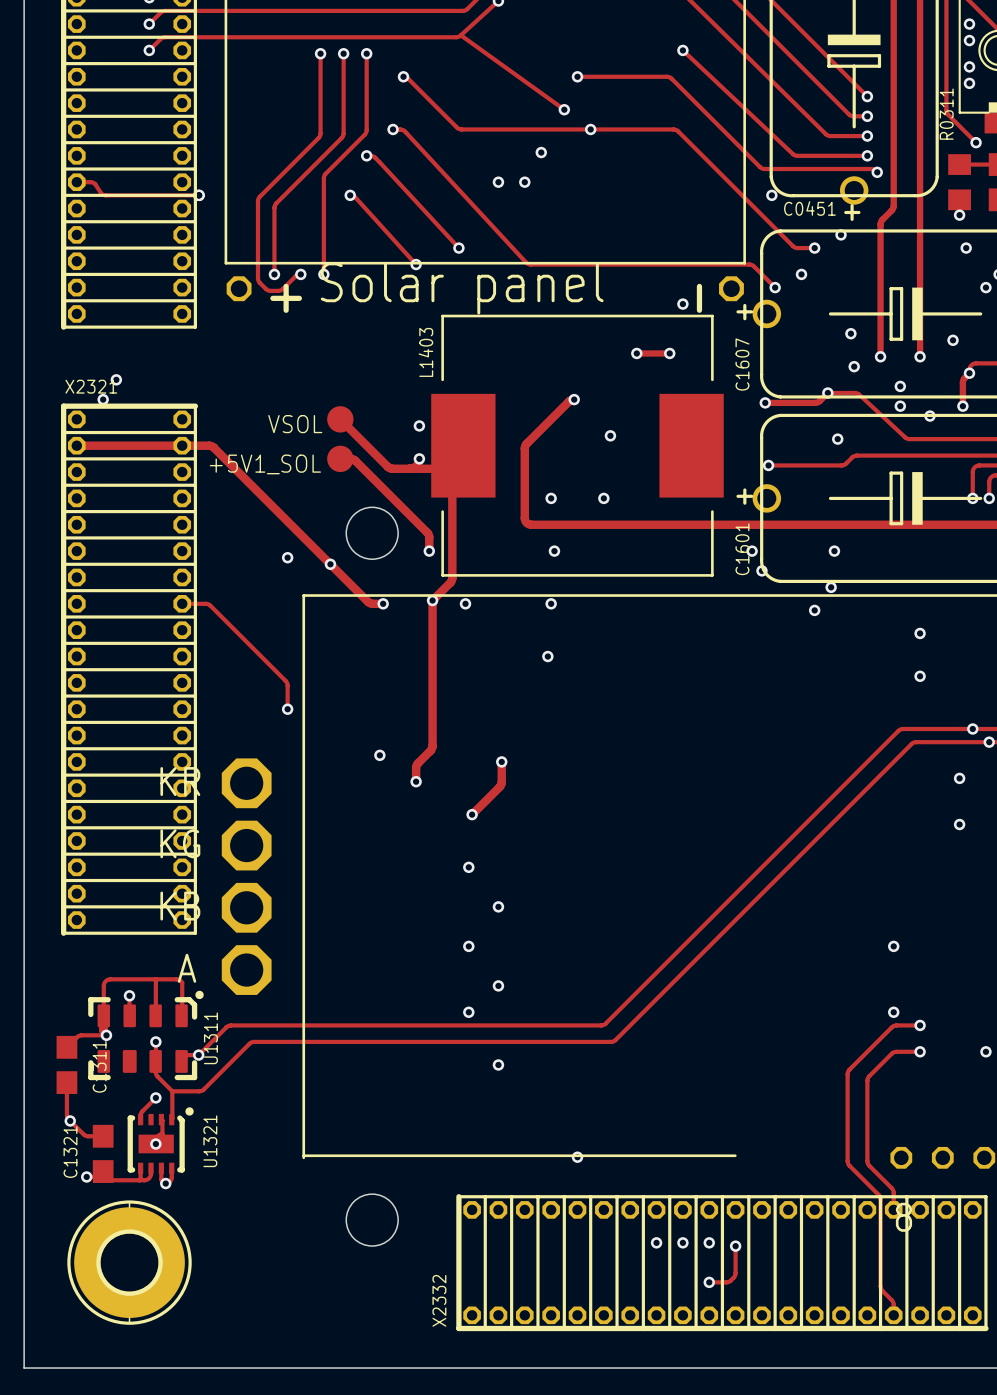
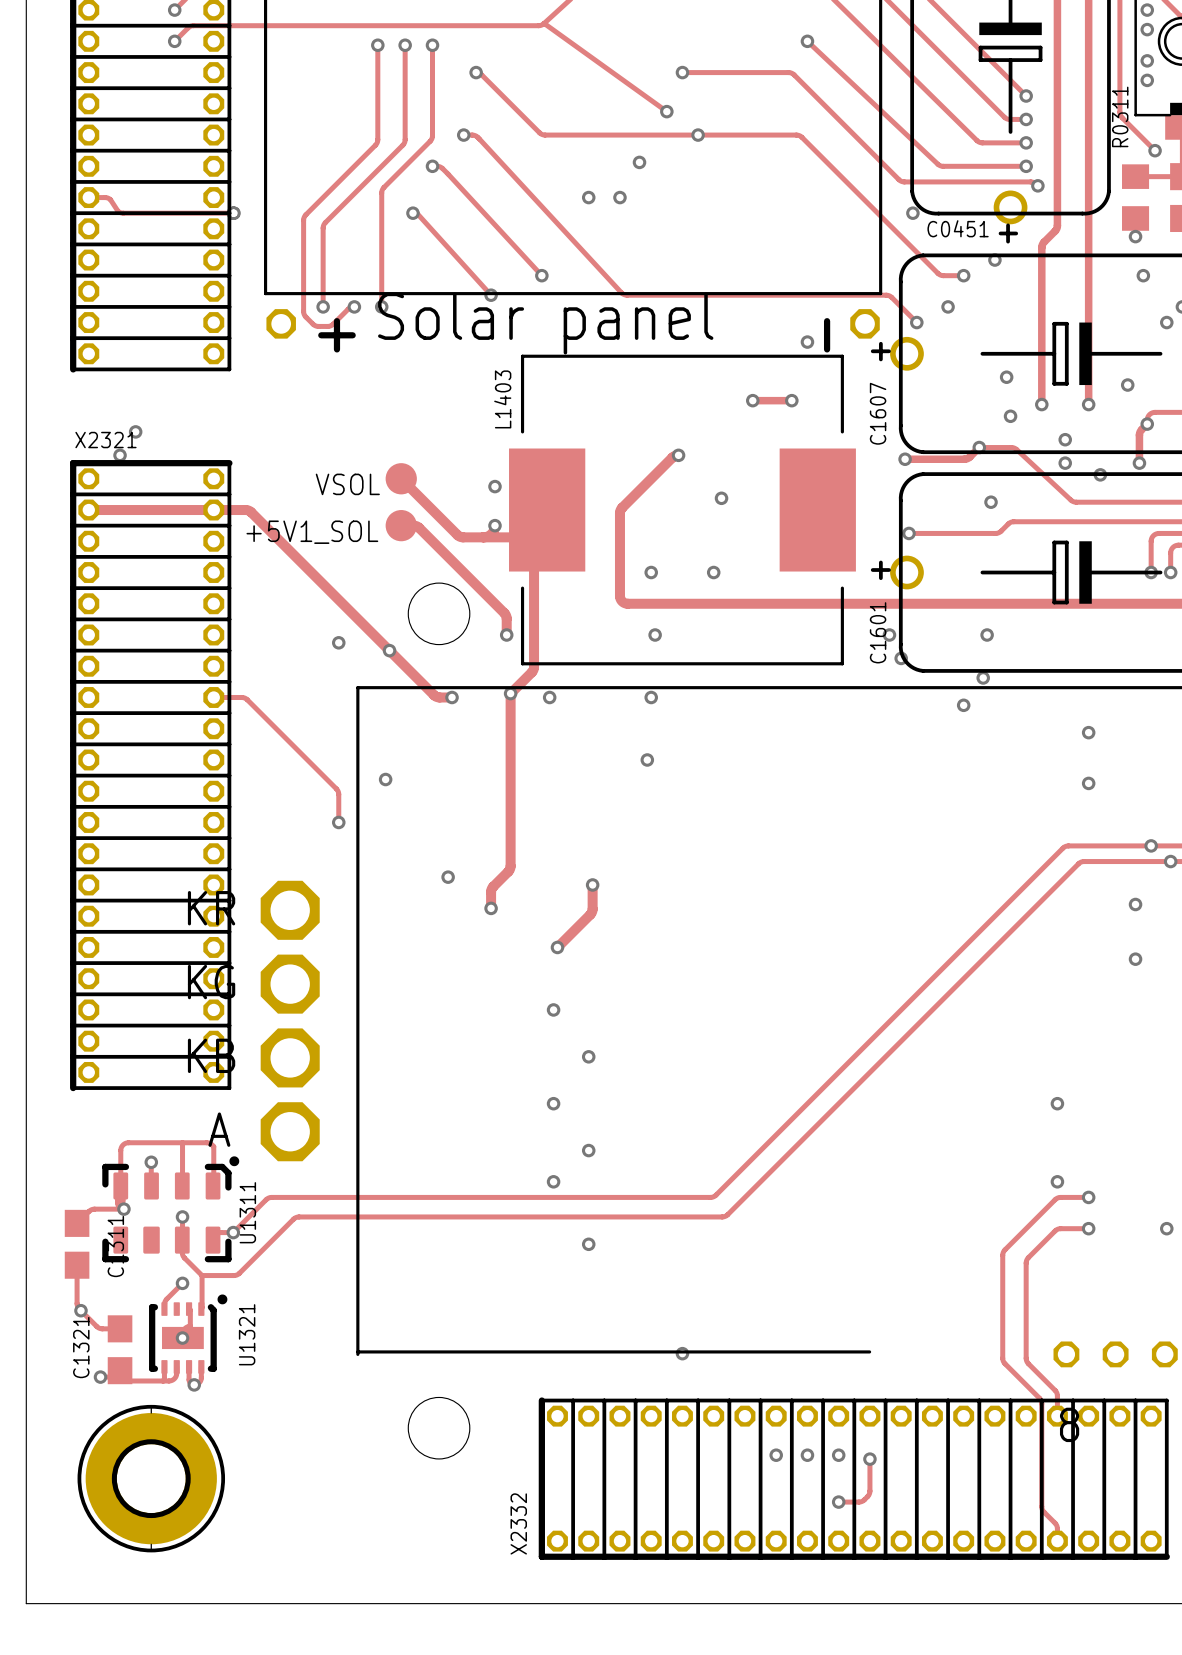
via: none -> (385, 779)

